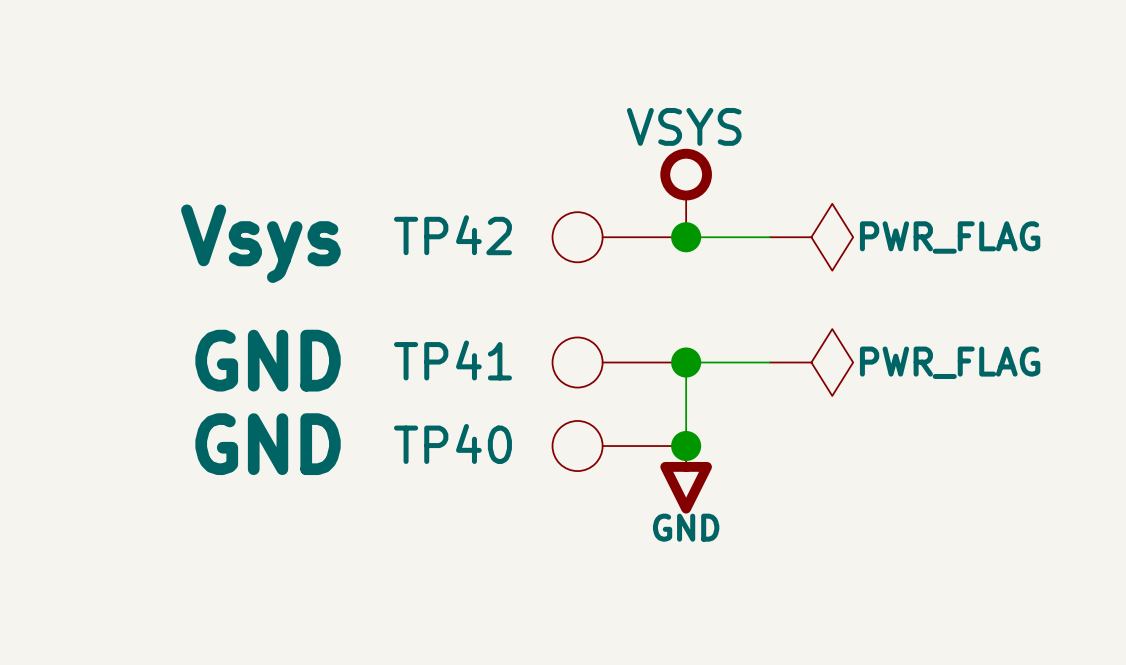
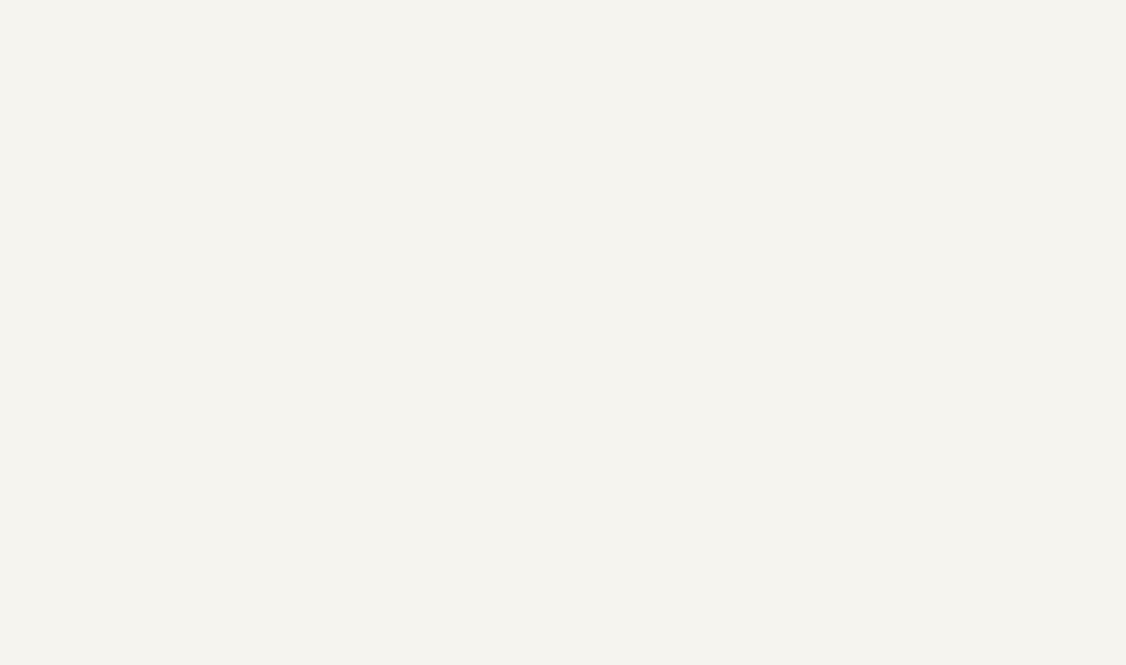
power symbol: VSYS (686, 193) -> none
TP42: Vsys (619, 237) -> none
wire: (686, 237) (769, 237) -> none
junction: (686, 237) -> none
power symbol: PWR_FLAG (811, 237) -> none
TP41: GND (619, 362) -> none
junction: (686, 362) -> none
wire: (769, 362) (686, 362) (686, 446) -> none
power symbol: PWR_FLAG (811, 362) -> none
TP40: GND (619, 446) -> none
junction: (686, 446) -> none
power symbol: GND (686, 479) -> none

